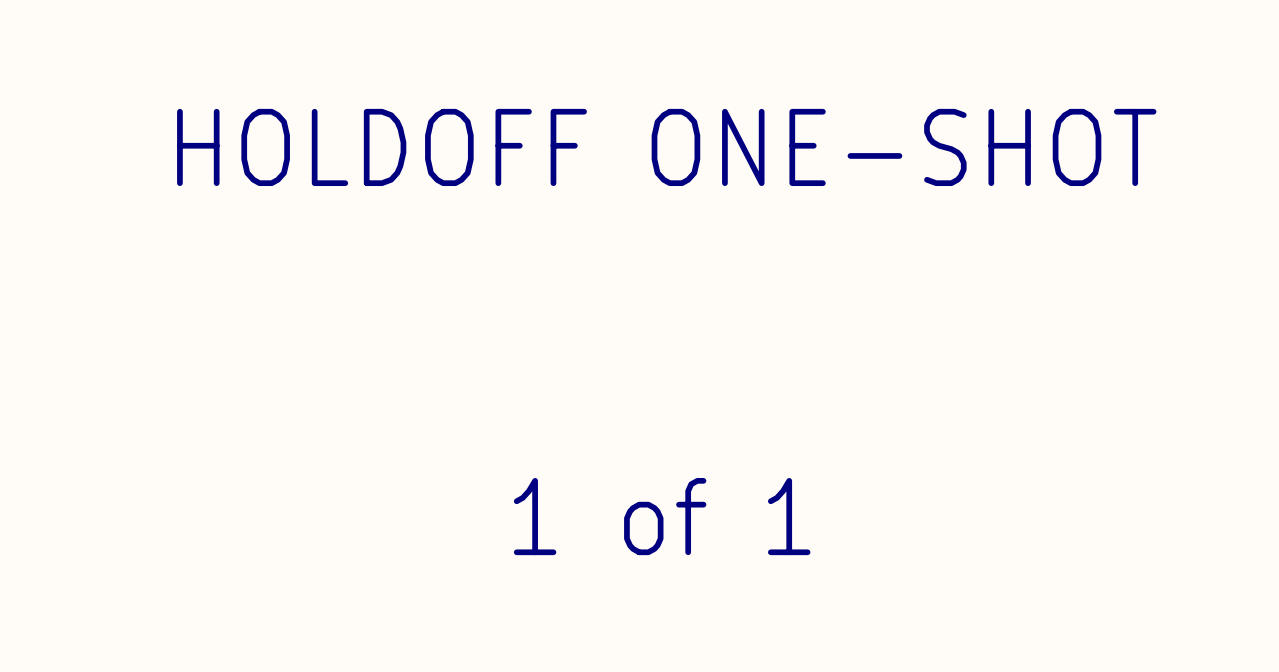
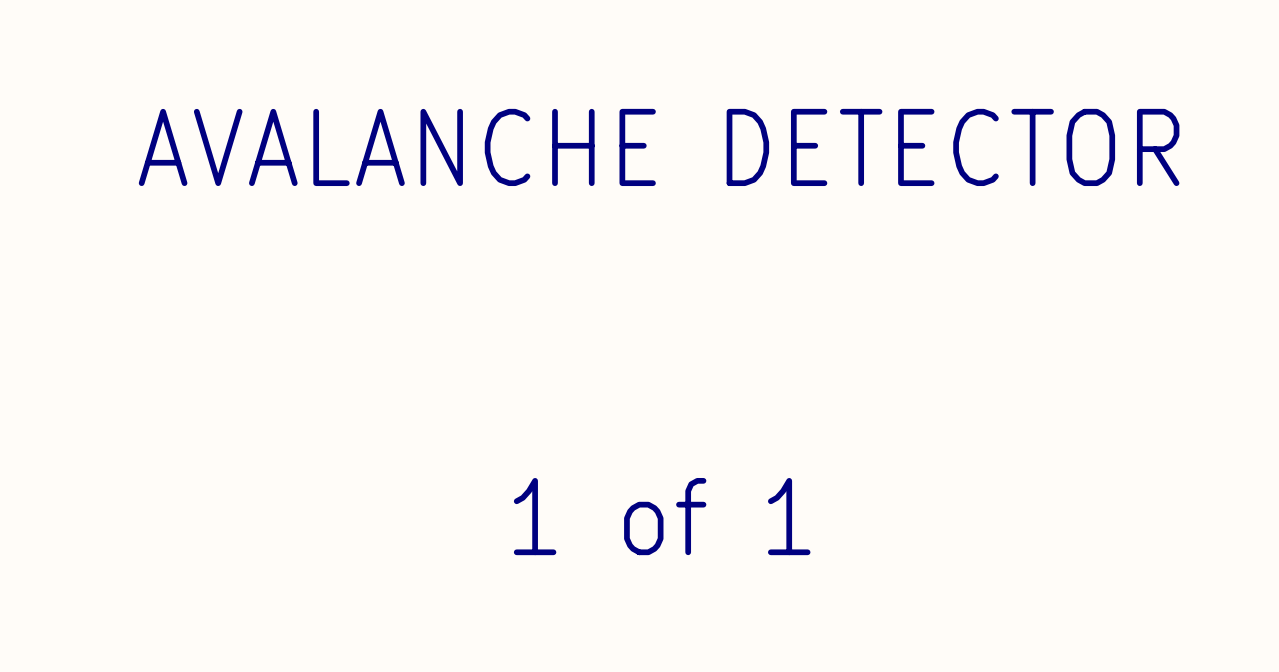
text: HOLDOFF ONE-SHOT (666, 147) -> AVALANCHE DETECTOR (659, 147)

